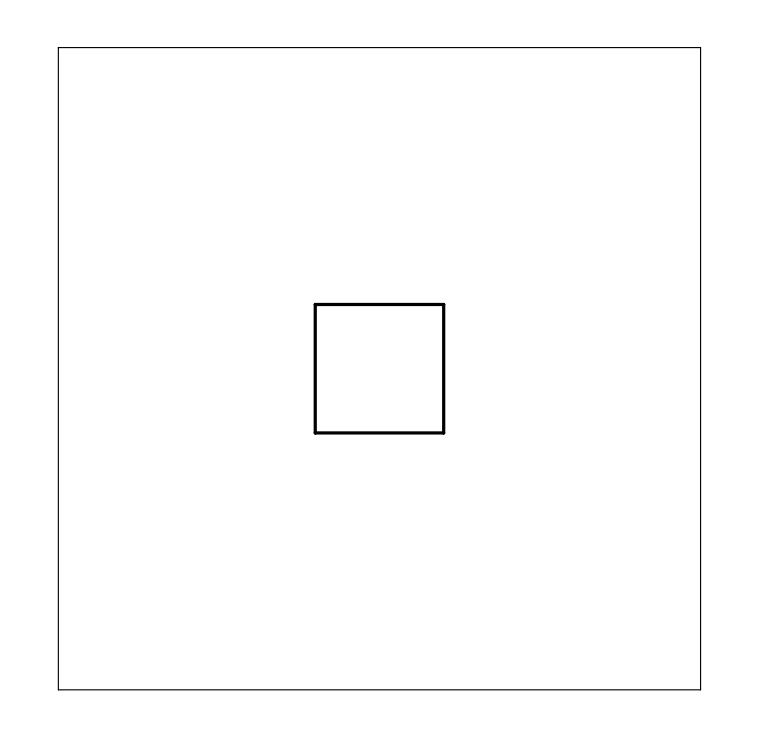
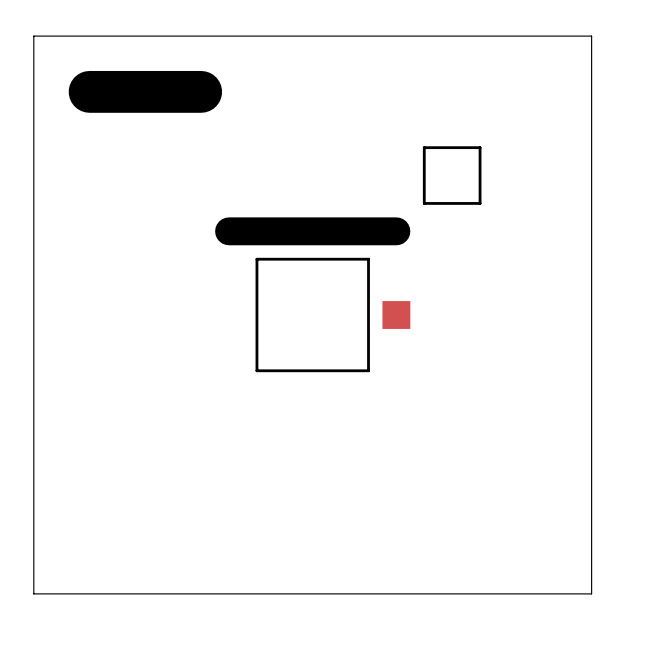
board edge: none -> (89, 91) (201, 91)
board edge: none -> (424, 147) (480, 147) (480, 203) (424, 203) (424, 147)
part: none -> (312, 294)

